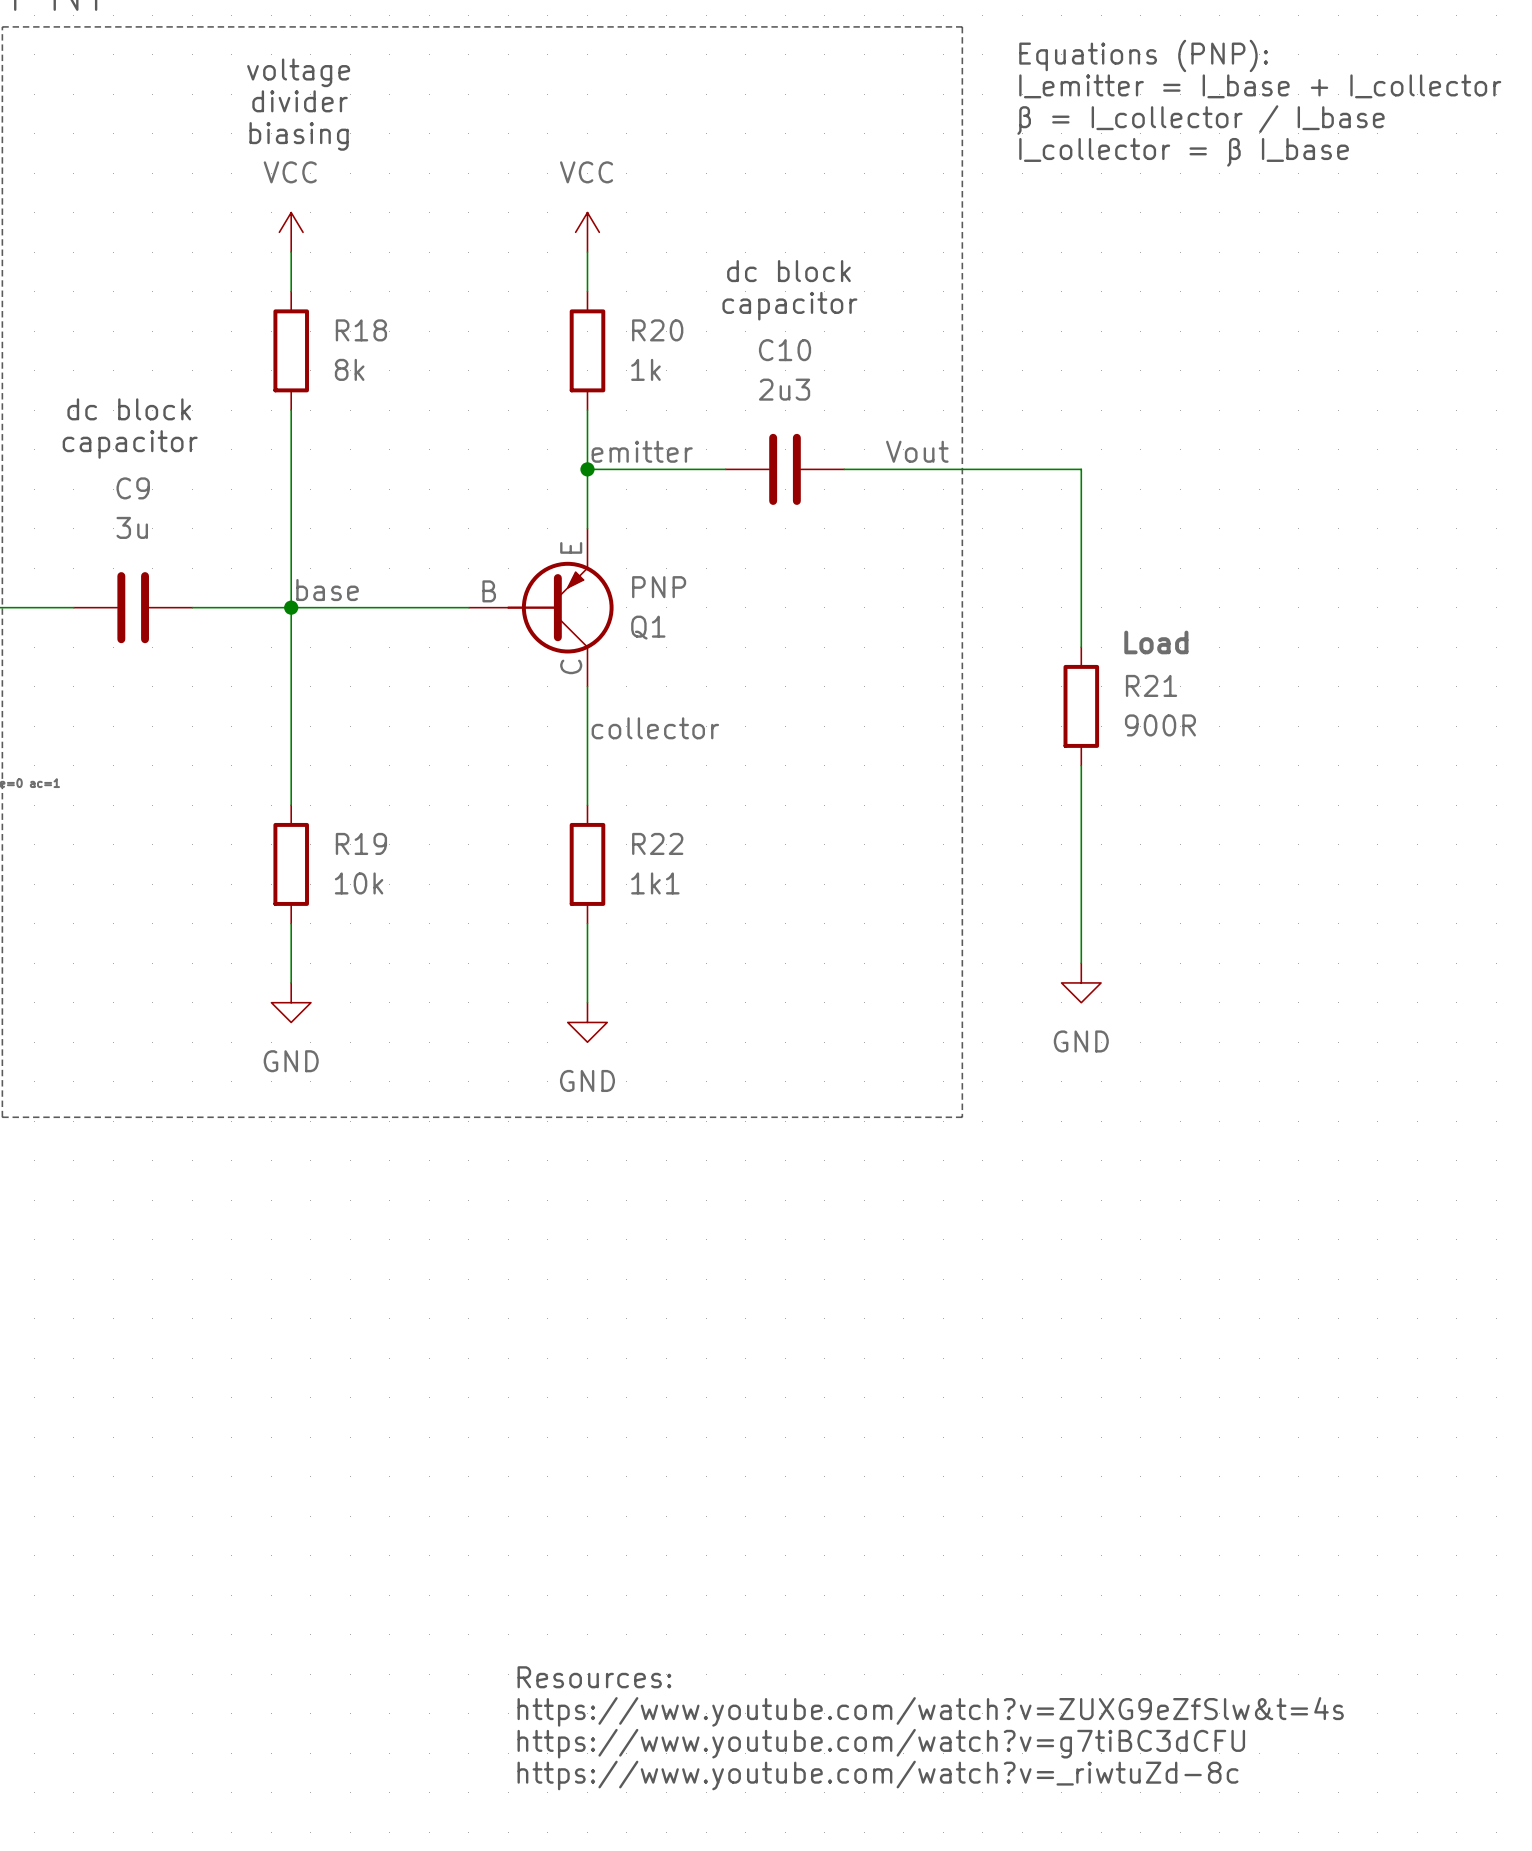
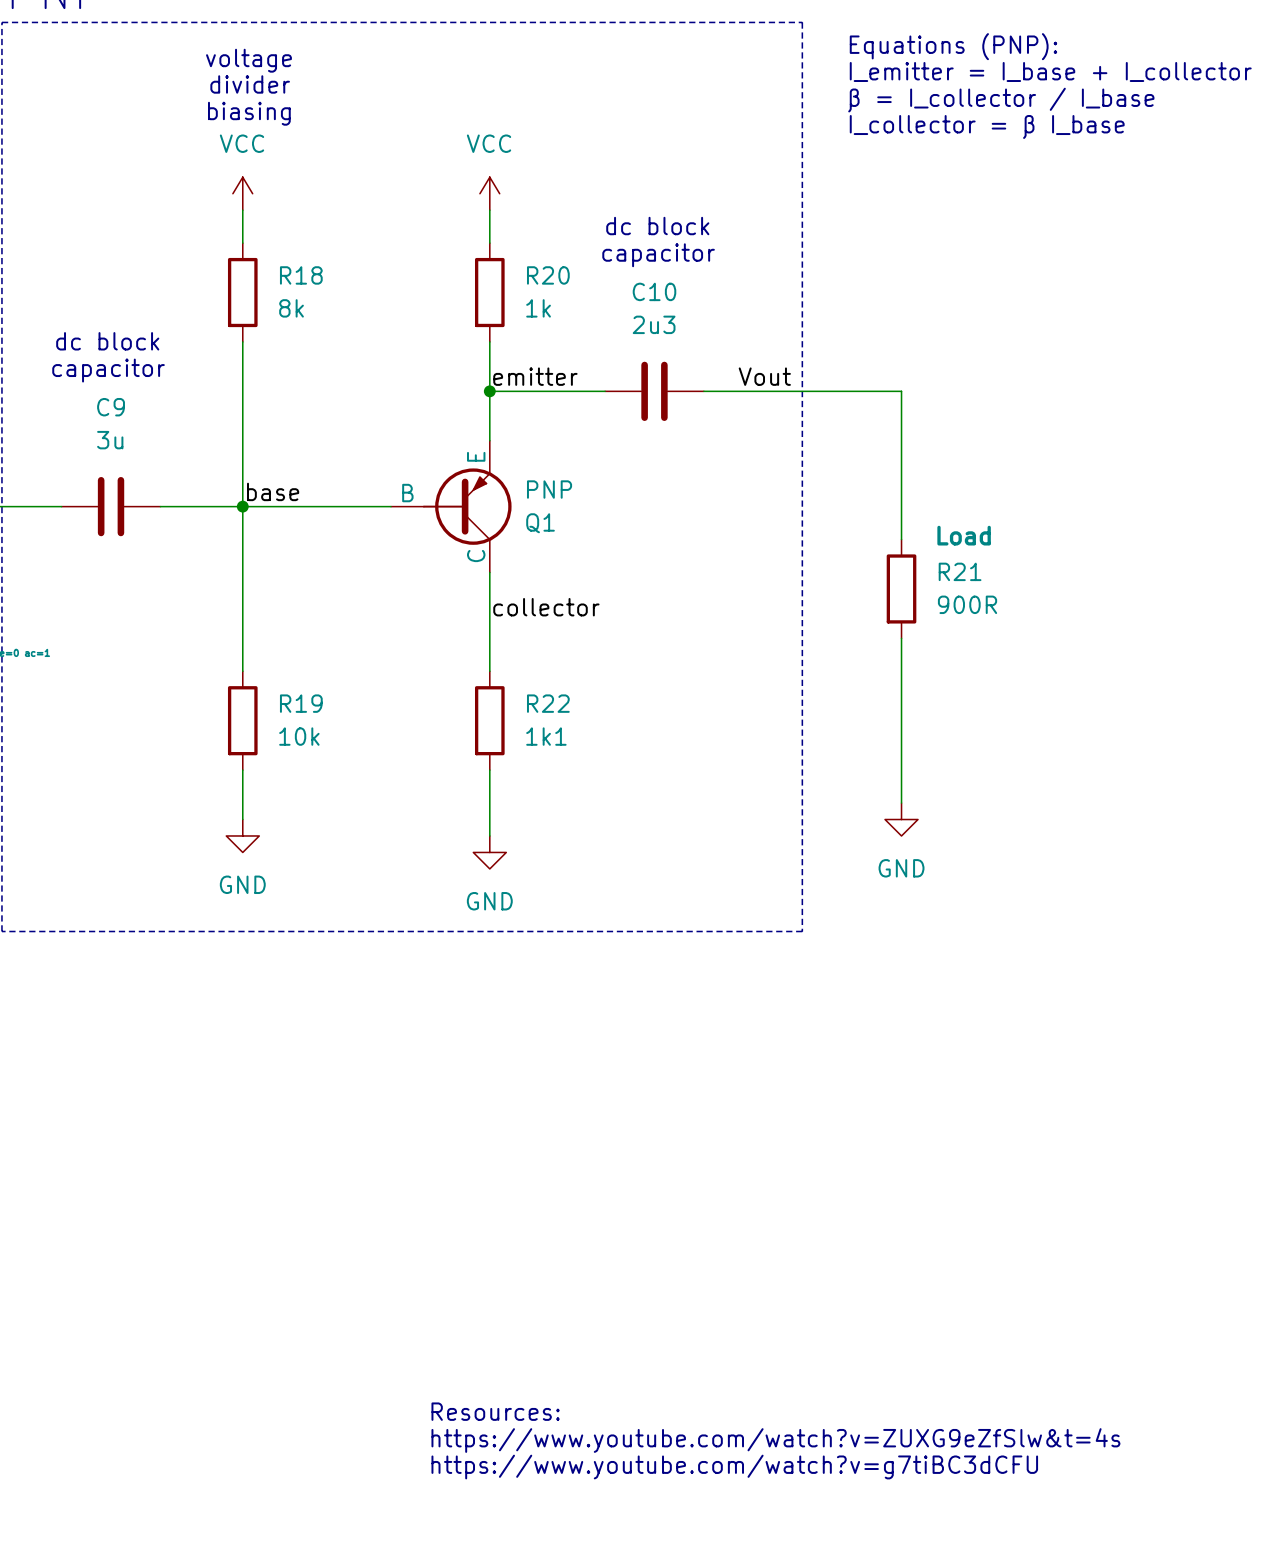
text position: Resources: (594, 1677) -> Resources: (495, 1411)
text position: https://www.youtube.com/watch?v=ZUXG9eZfSlw&t=4s (930, 1711) -> https://www.youtube.com/watch?v=ZUXG9eZfSlw&t=4s (775, 1440)
text position: https://www.youtube.com/watch?v=g7tiBC3dCFU (881, 1743) -> https://www.youtube.com/watch?v=g7tiBC3dCFU (734, 1467)
text: https://www.youtube.com/watch?v=_riwtuZd-8c (878, 1775) -> none

